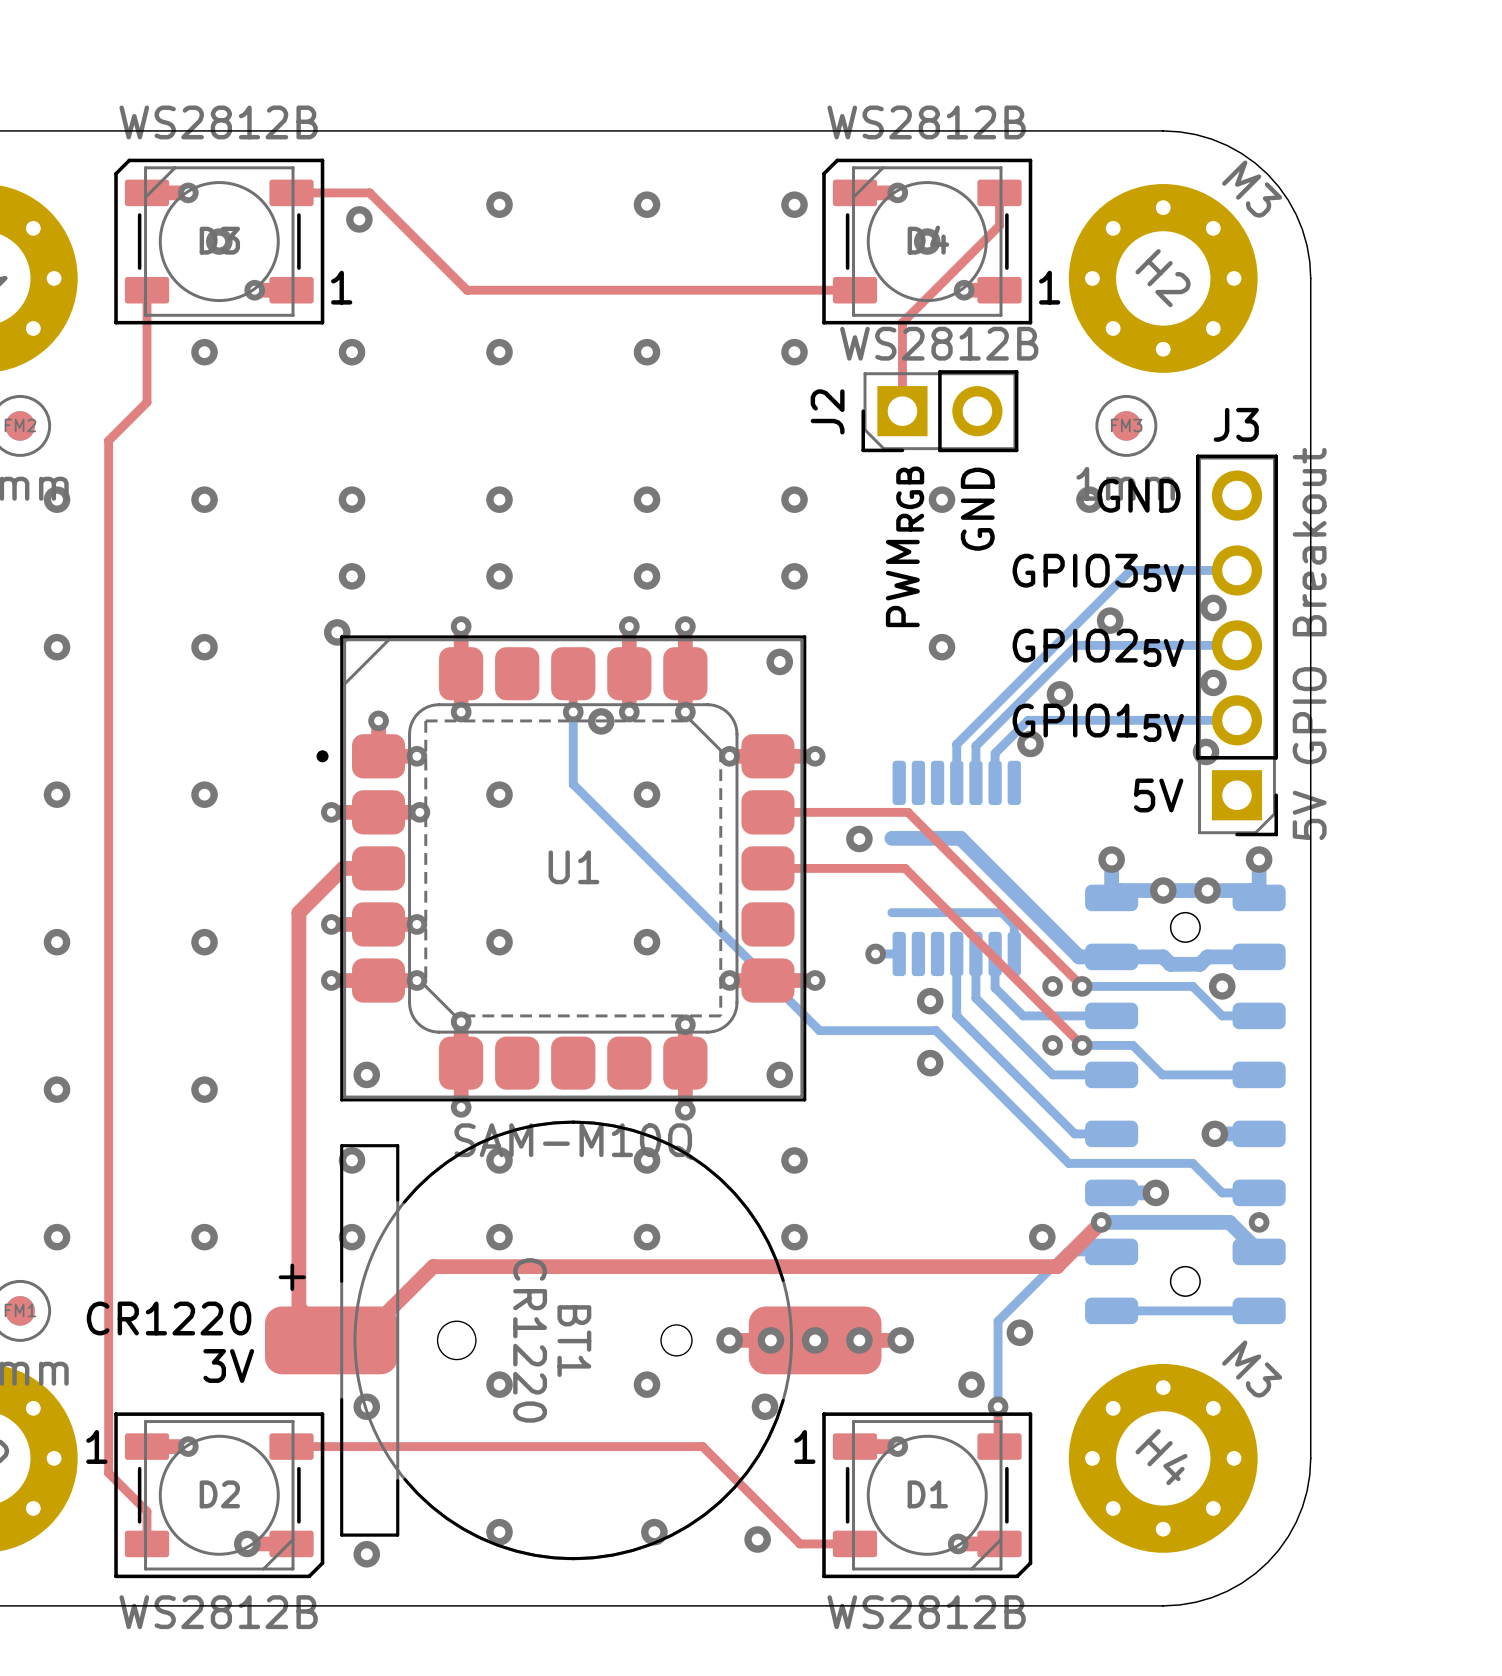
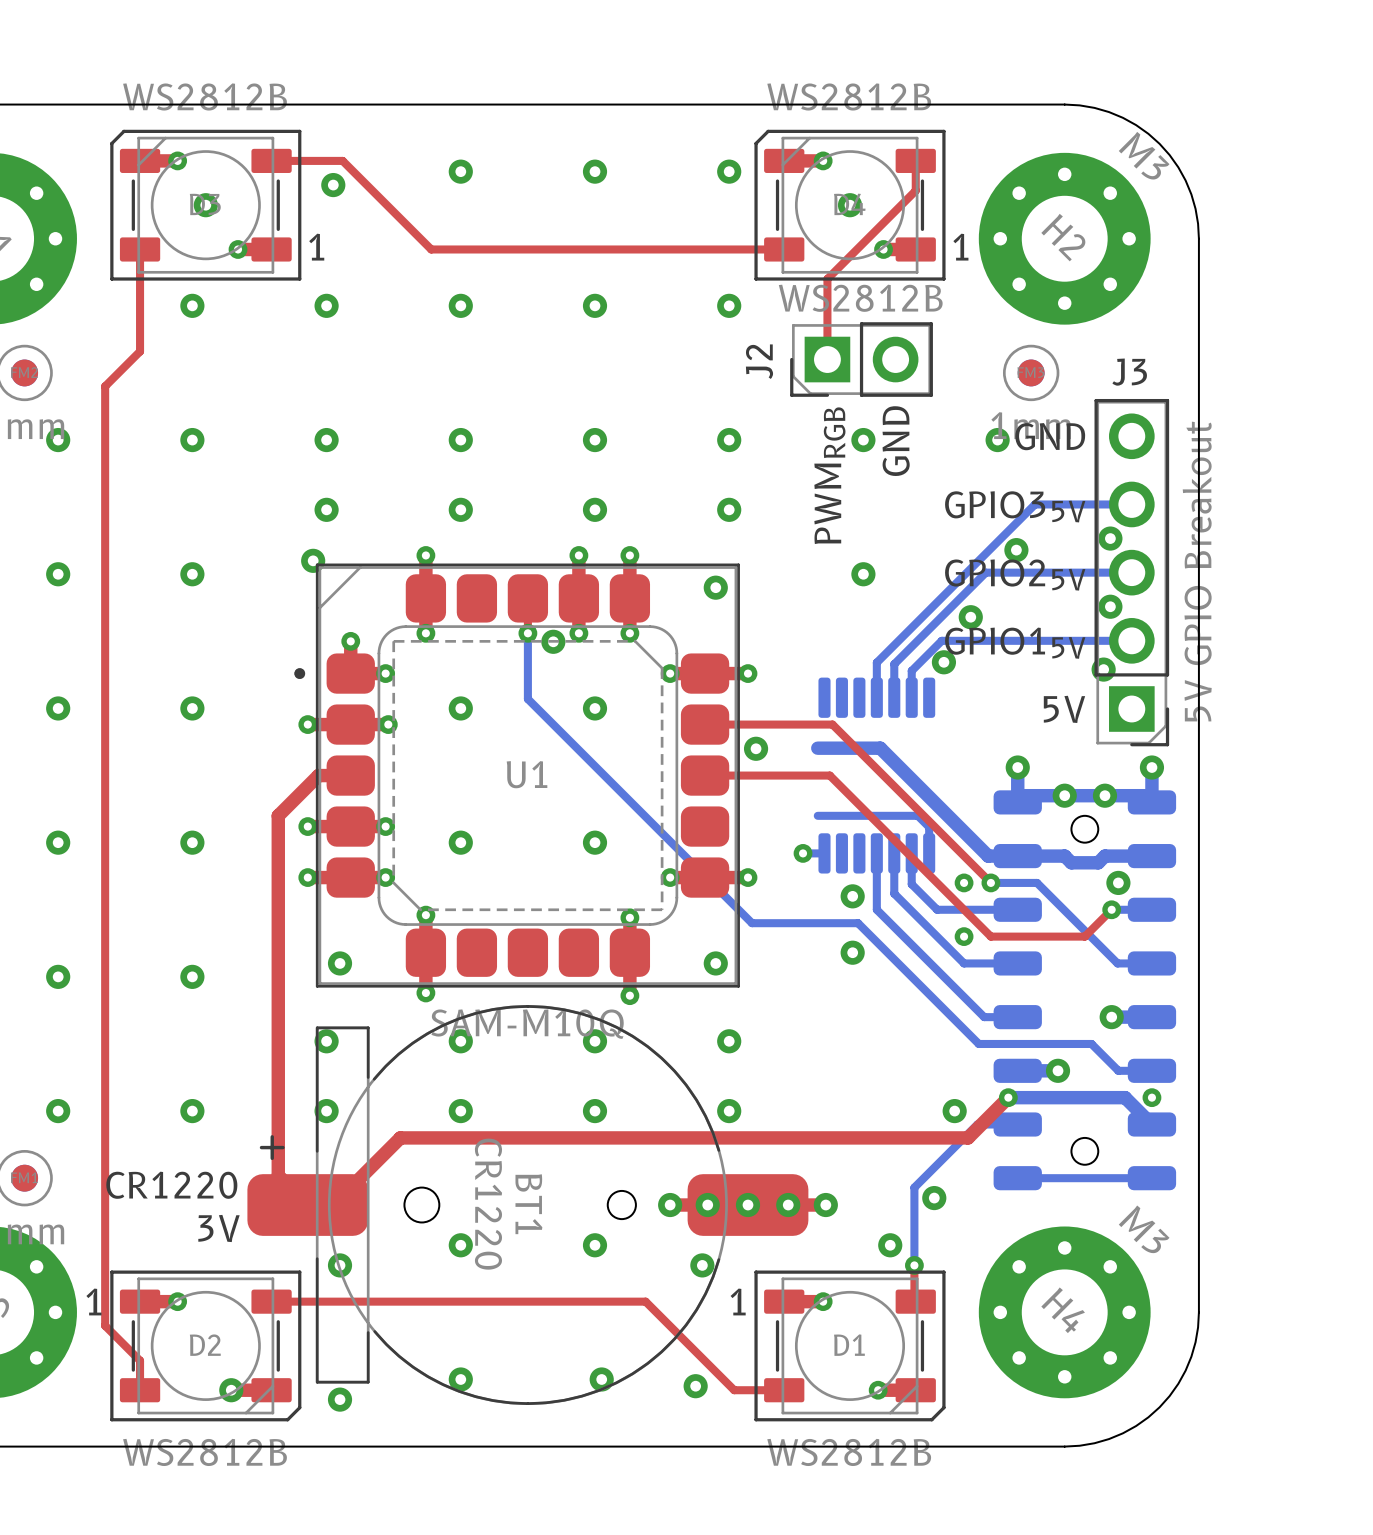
via position: (859, 838) -> (756, 748)
bottom track: (1132, 986) (1192, 986) (1222, 1015) -> (1037, 882) (1117, 963)
top track: none -> (1111, 909) (1084, 936) (990, 936)
bottom track: (1082, 1045) (1132, 1045) (1162, 1074) (1221, 1074) -> none
via position: (1082, 1045) -> (1111, 909)

